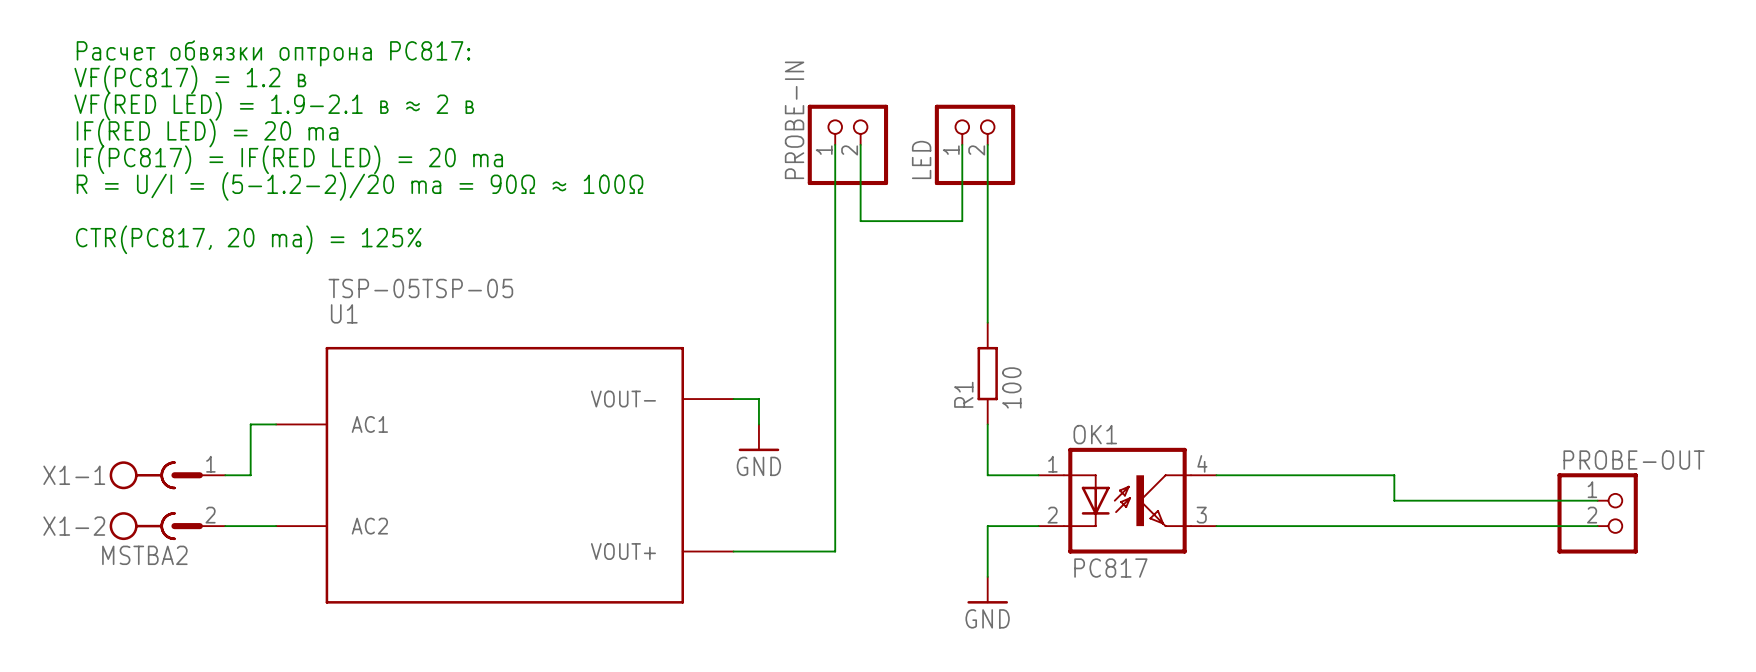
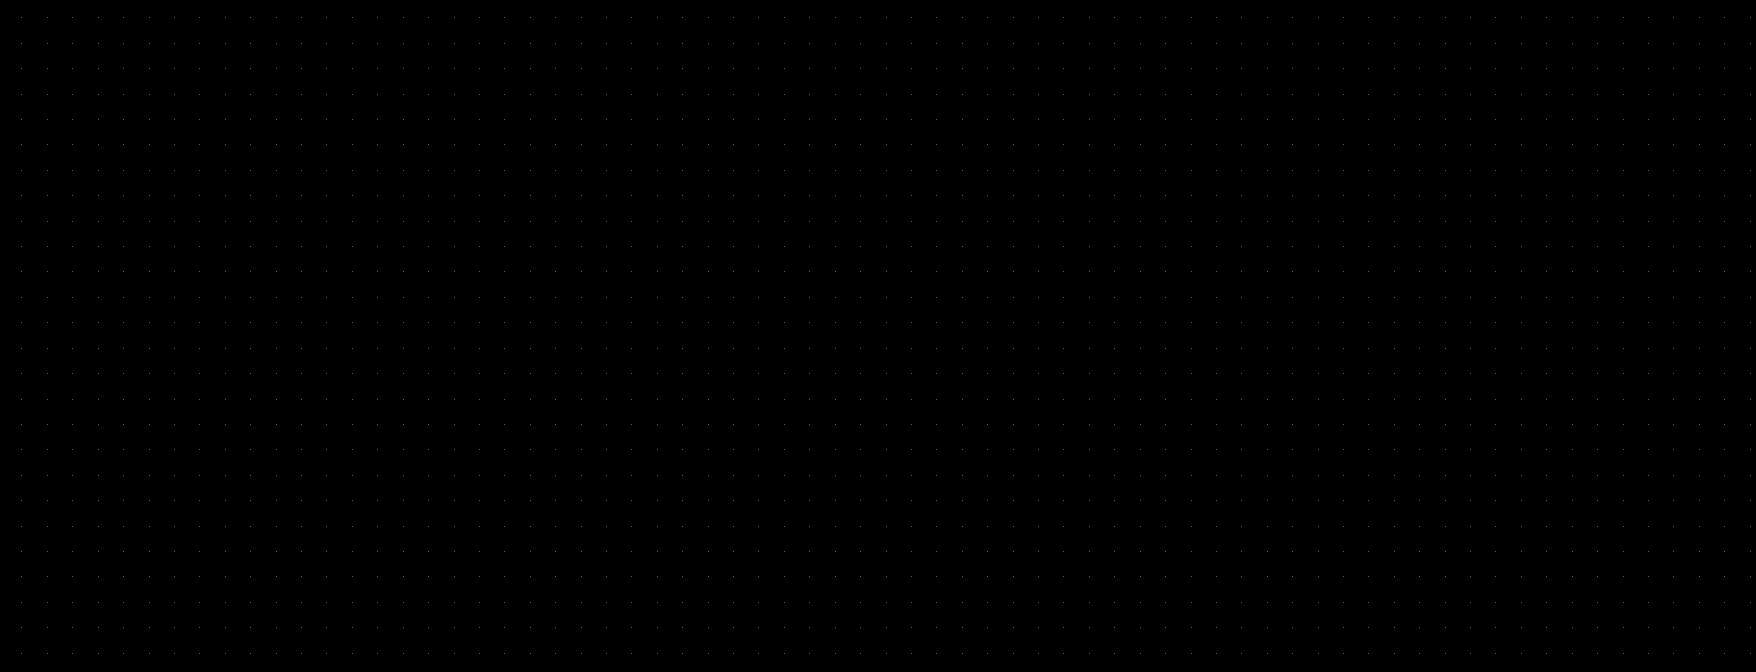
text: Расчет обвязки оптрона PC817: (273, 53) -> none
text: VF(PC817) = 1.2 в (190, 79) -> none
text: VF(RED LED) = 1.9-2.1 в ≈ 2 в (274, 106) -> none
text: IF(RED LED) = 20 ma (207, 133) -> none
wire: (835, 144) (835, 551) (733, 551) -> none
PROBE-IN: (847, 144) -> none
wire: (860, 144) (860, 221) (962, 221) (962, 144) -> none
LED: (974, 144) -> none
wire: (987, 144) (987, 322) -> none
text: IF(PC817) = IF(RED LED) = 20 ma (289, 159) -> none
text: R = U/I = (5-1.2-2)/20 ma = 90Ω ≈ 100Ω (360, 186) -> none
text: CTR(PC817, 20 ma) = 125% (248, 239) -> none
R1: 100 (987, 373) -> none
wire: (733, 399) (758, 399) (758, 424) -> none
wire: (276, 424) (250, 424) (250, 475) (225, 475) -> none
wire: (987, 424) (987, 475) (1038, 475) -> none
power symbol: GND (758, 437) -> none
X1-1: (167, 475) -> none
U1: TSP-05TSP-05 (504, 475) -> none
wire: (1216, 475) (1394, 475) (1394, 500) (1597, 500) -> none
OK1: PC817 (1127, 500) -> none
PROBE-OUT: (1597, 513) -> none
X1-2: MSTBA2 (167, 526) -> none
wire: (225, 526) (276, 526) -> none
wire: (1038, 526) (987, 526) (987, 576) -> none
wire: (1216, 526) (1597, 526) -> none
power symbol: GND (987, 590) -> none

